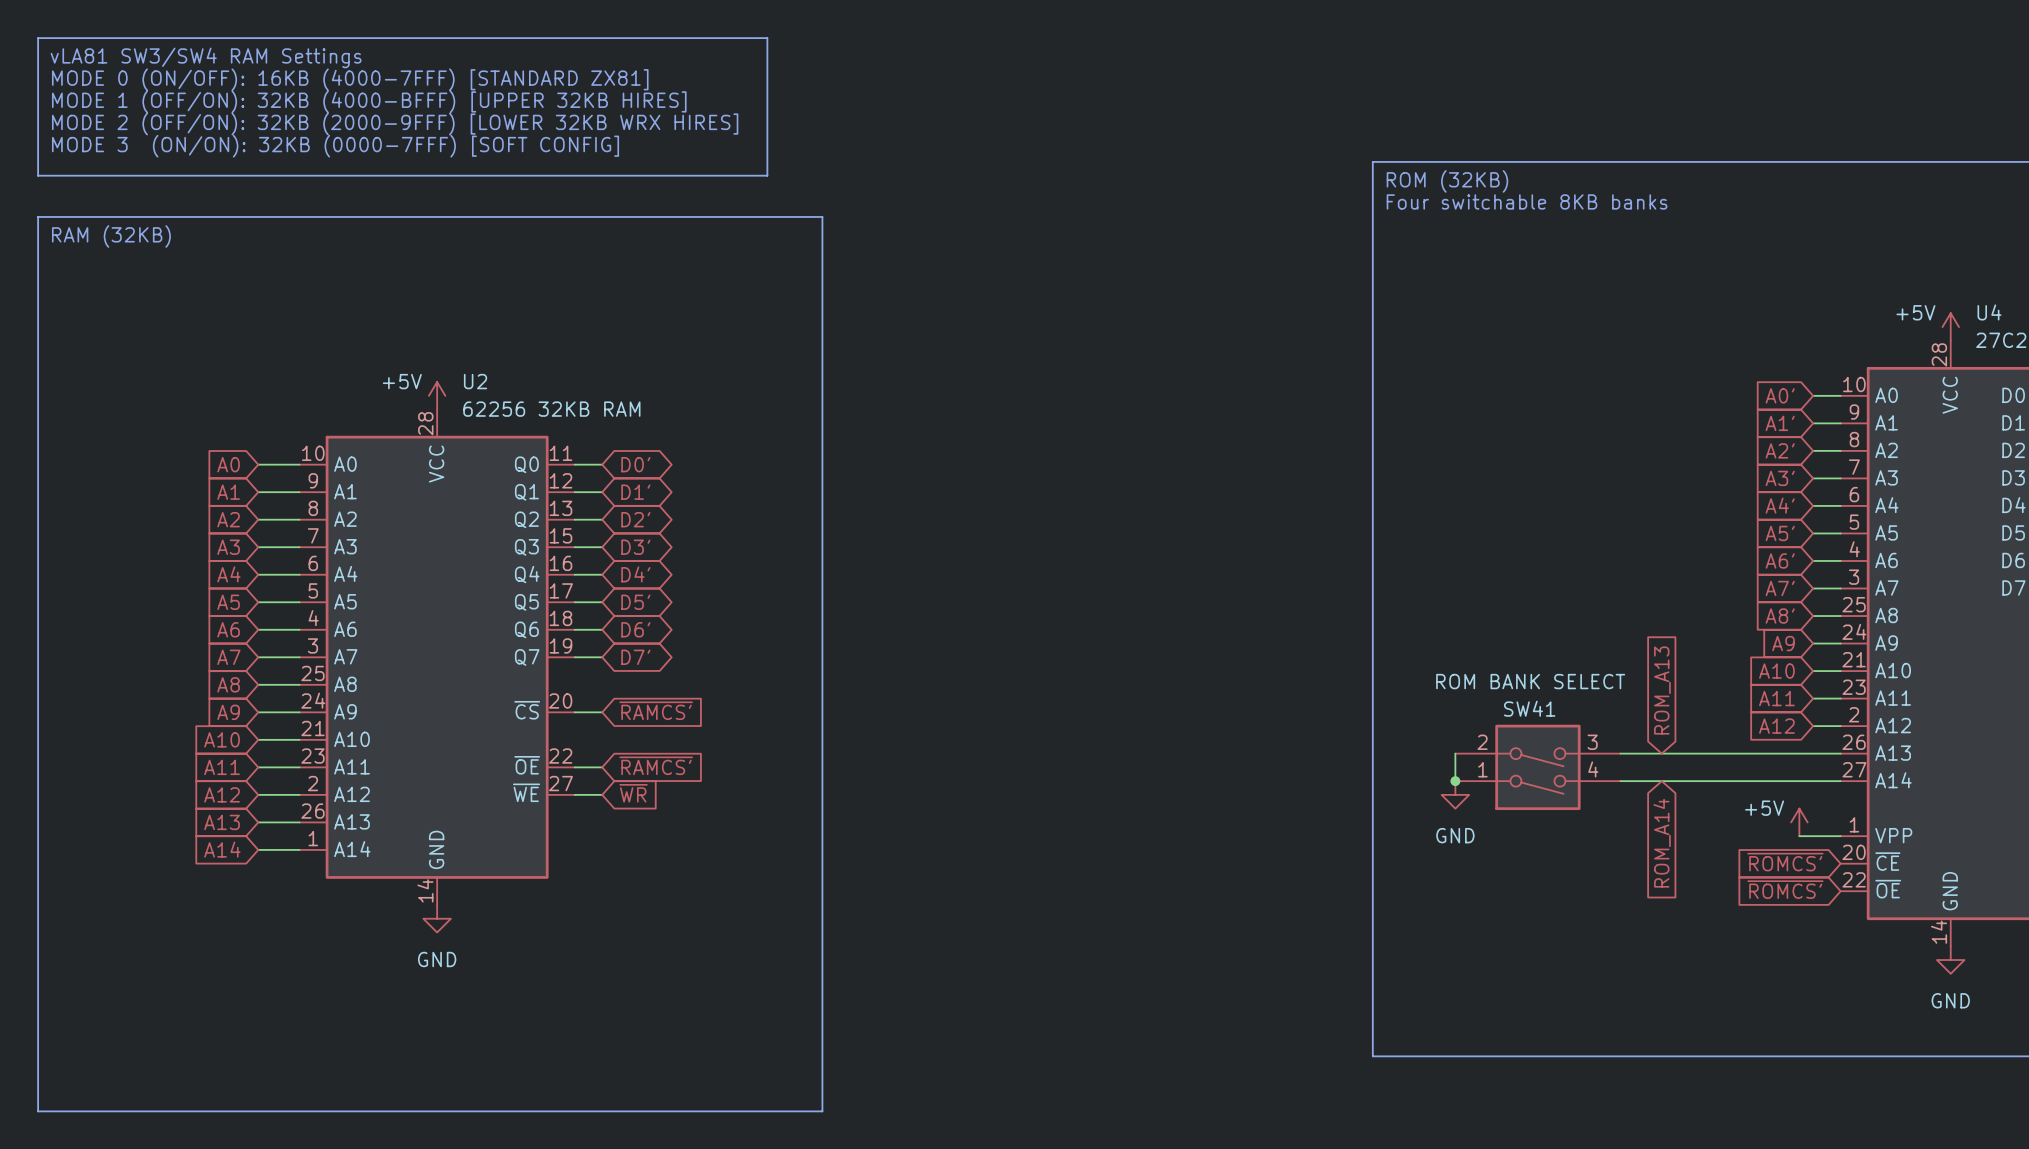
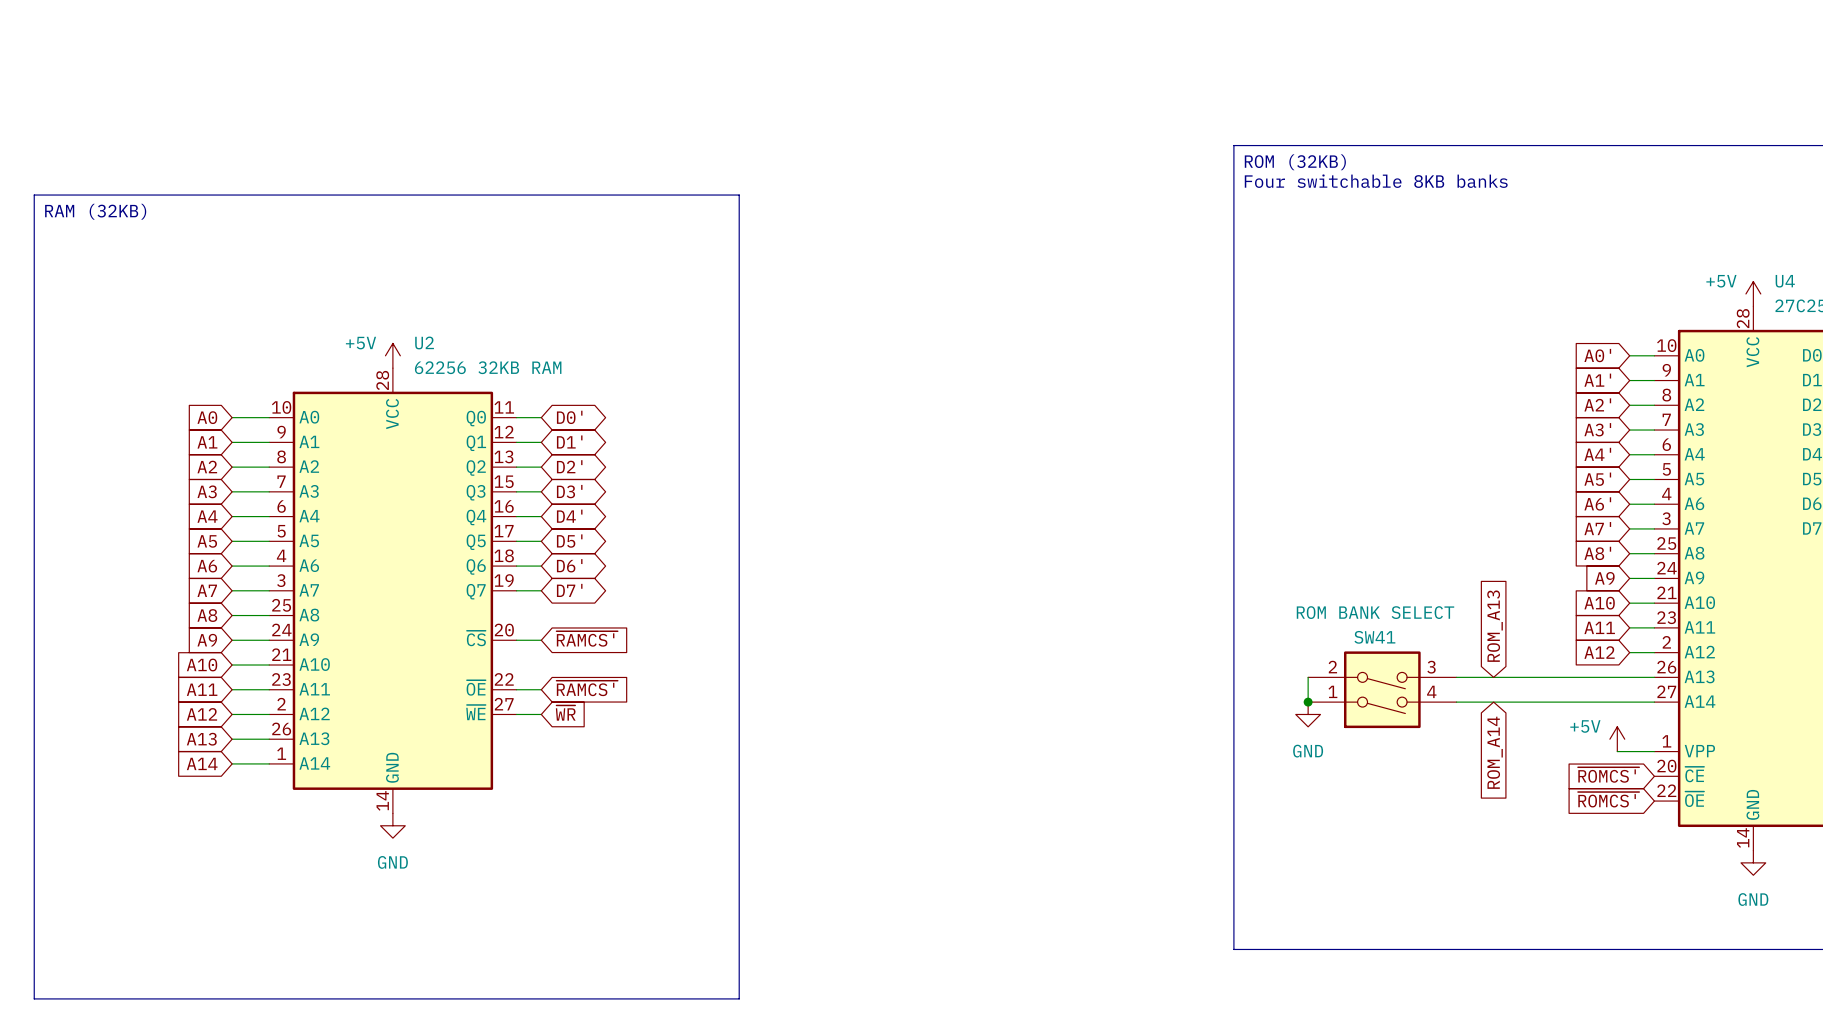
line: (38, 38) (767, 38) (767, 175) (38, 175) (38, 38) -> none
text: vLA81 SW3/SW4 RAM Settings (206, 57) -> none
text: MODE 0 (ON/OFF): 16KB (4000-7FFF) [STANDARD ZX81] (350, 79) -> none
text: MODE 1 (OFF/ON): 32KB (4000-BFFF) [UPPER 32KB HIRES] (369, 101) -> none
text: MODE 2 (OFF/ON): 32KB (2000-9FFF) [LOWER 32KB WRX HIRES] (395, 124) -> none
text: MODE 3 (ON/ON): 32KB (0000-7FFF) [SOFT CONFIG] (335, 146) -> none

